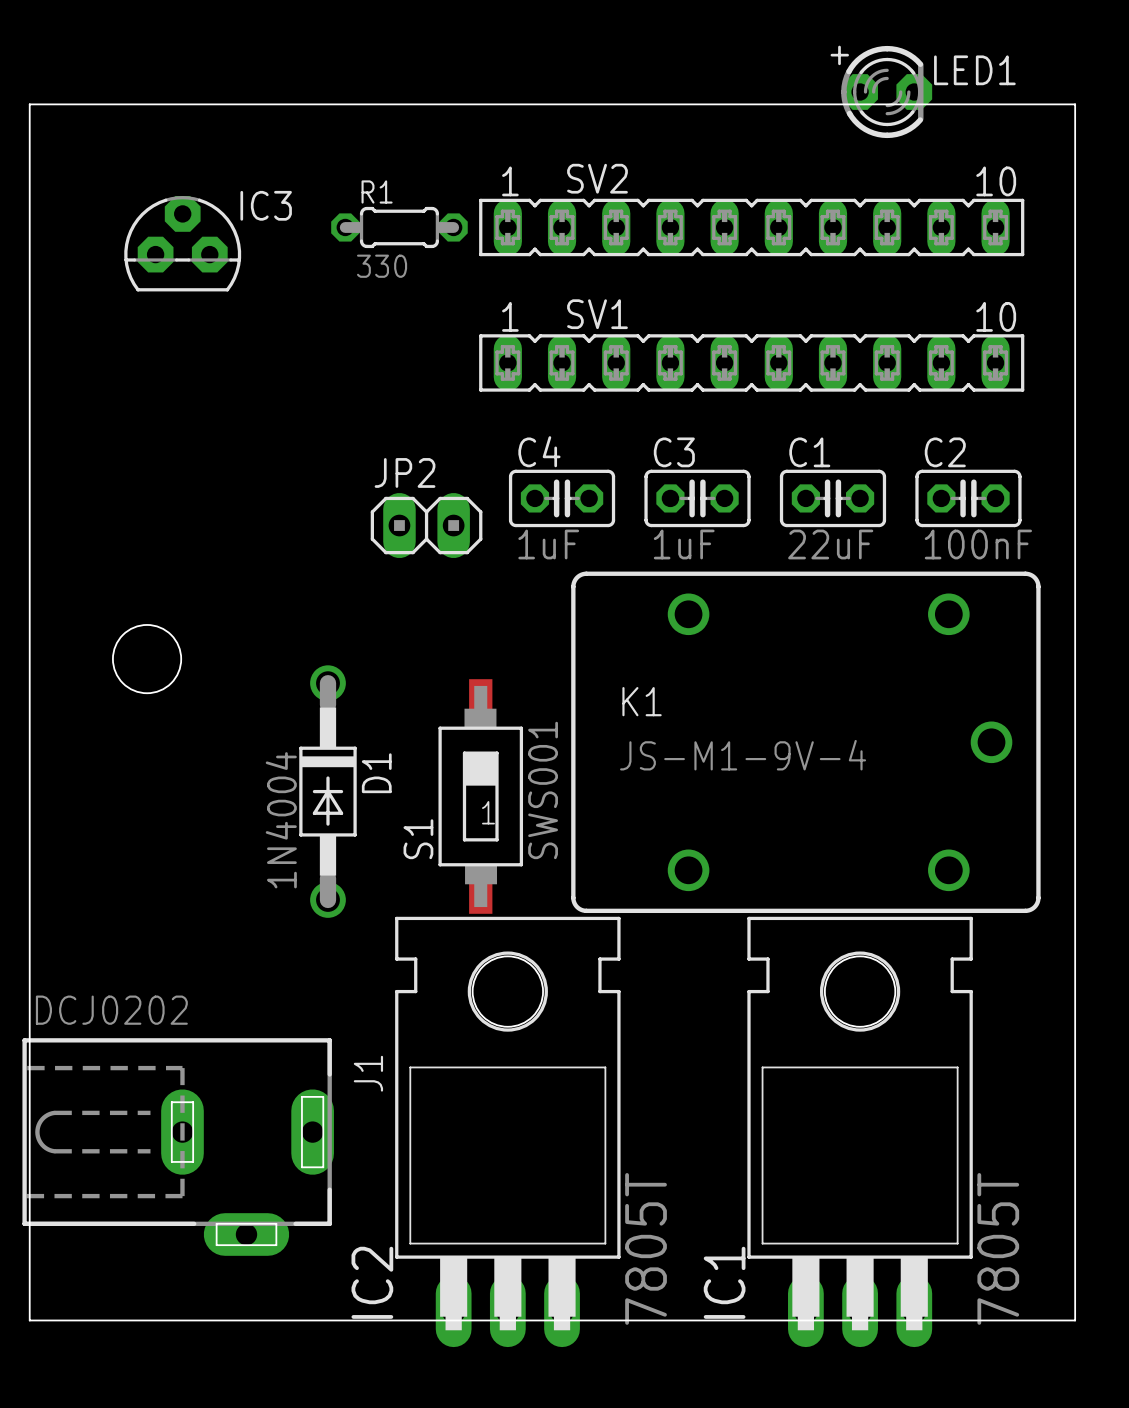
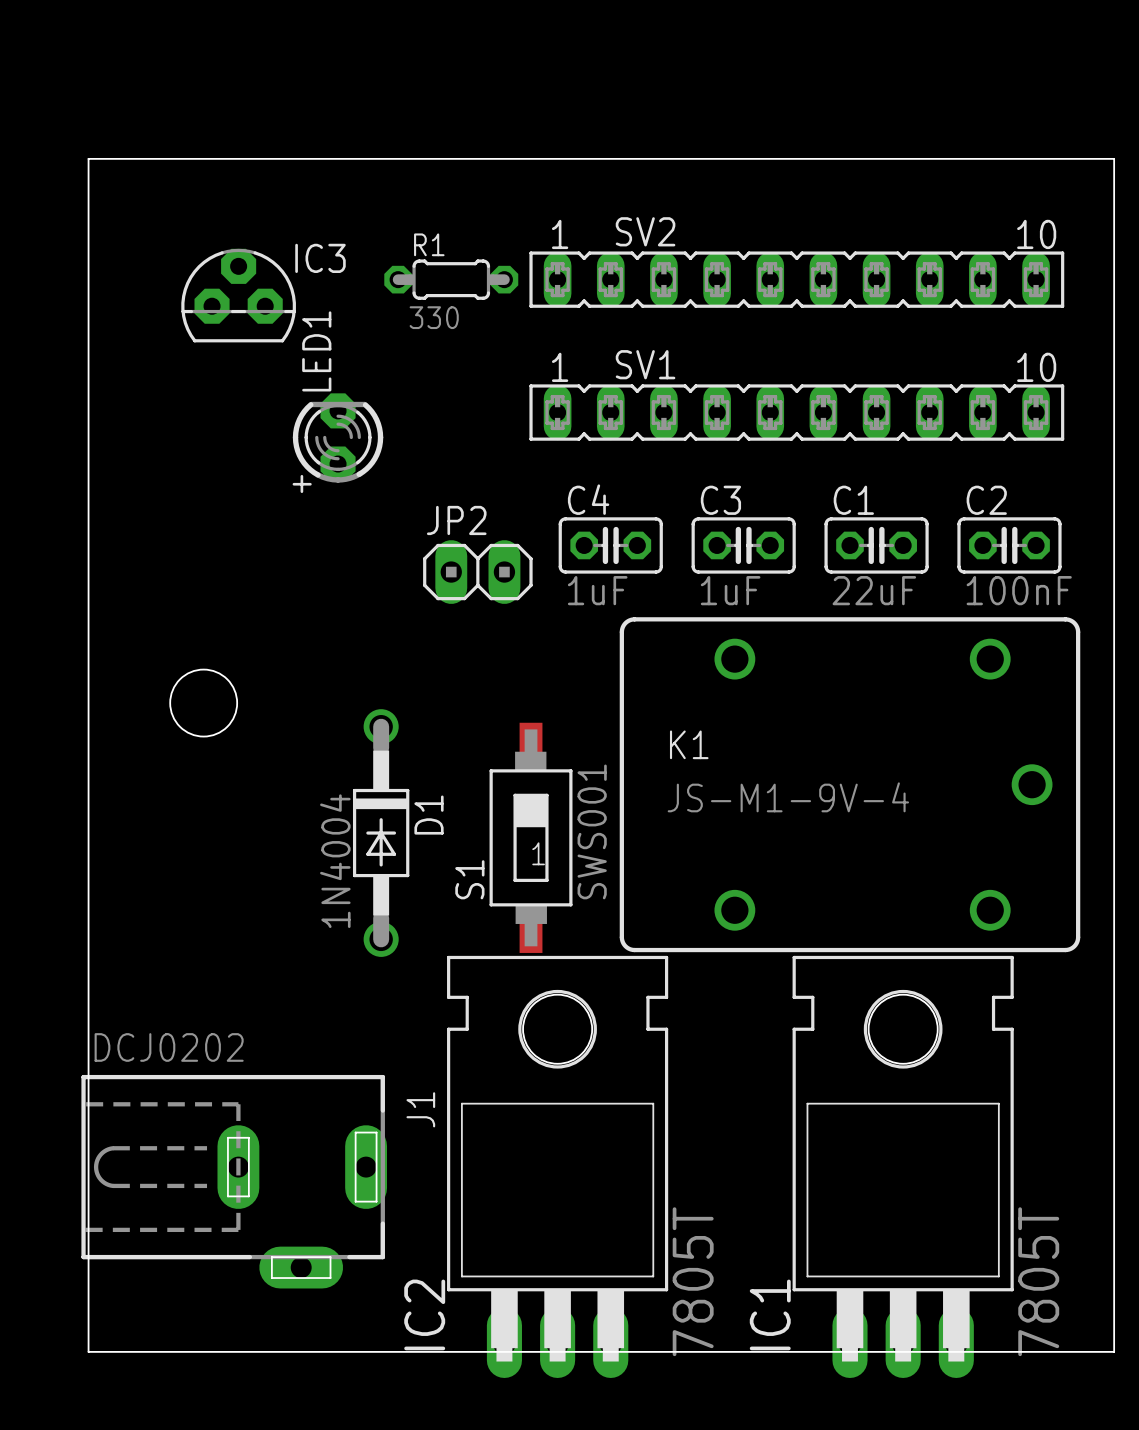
LED1 rotation: 0° (881, 91) -> 90° counterclockwise (337, 443)
LED1 position: (881, 91) -> (337, 443)

